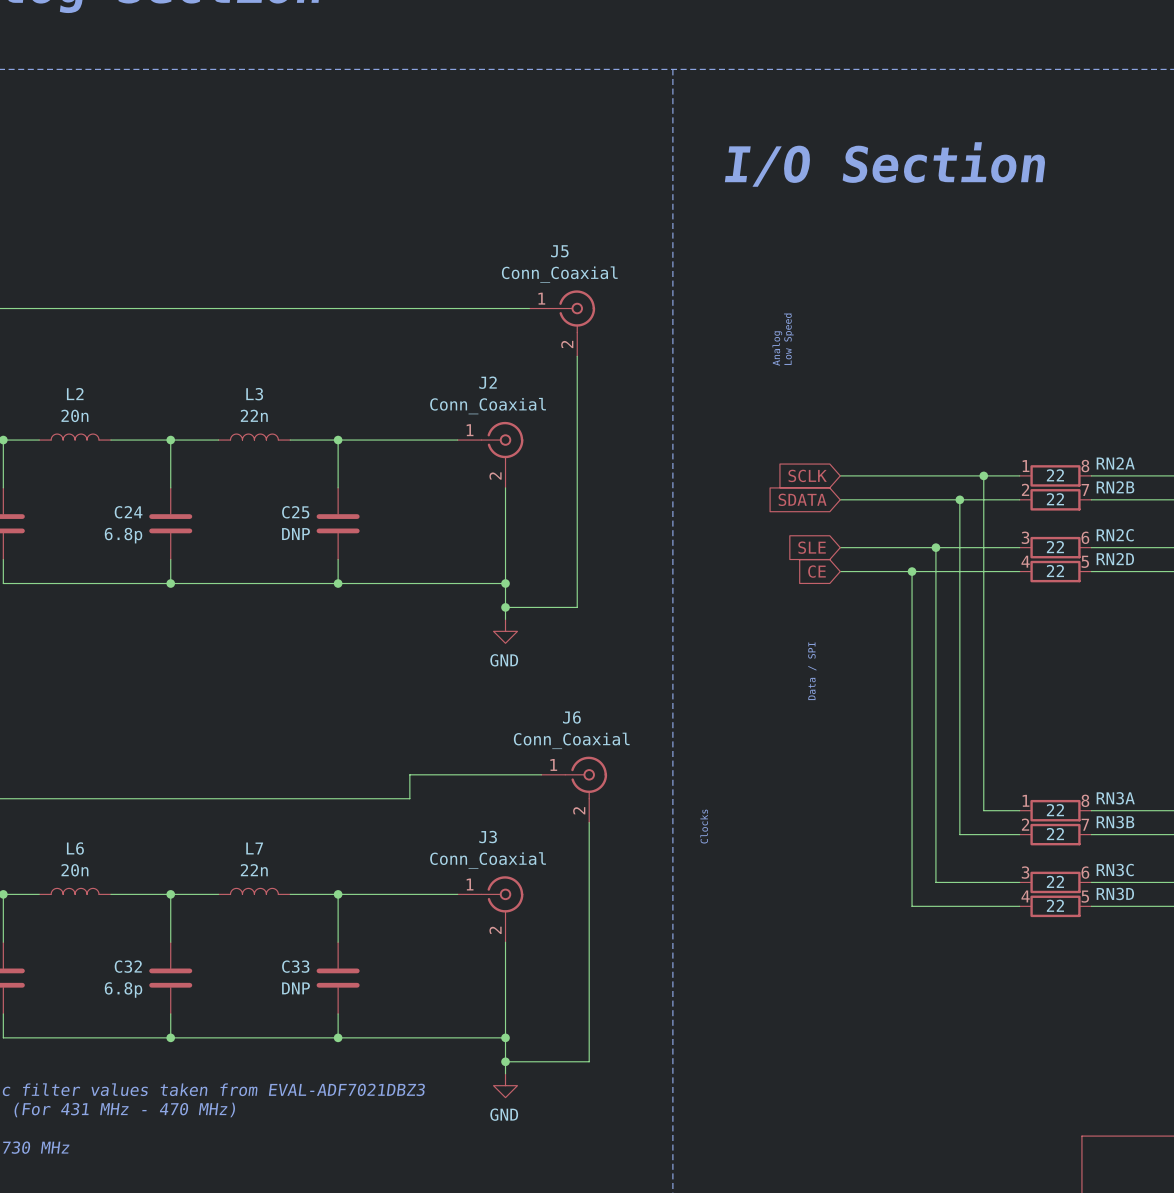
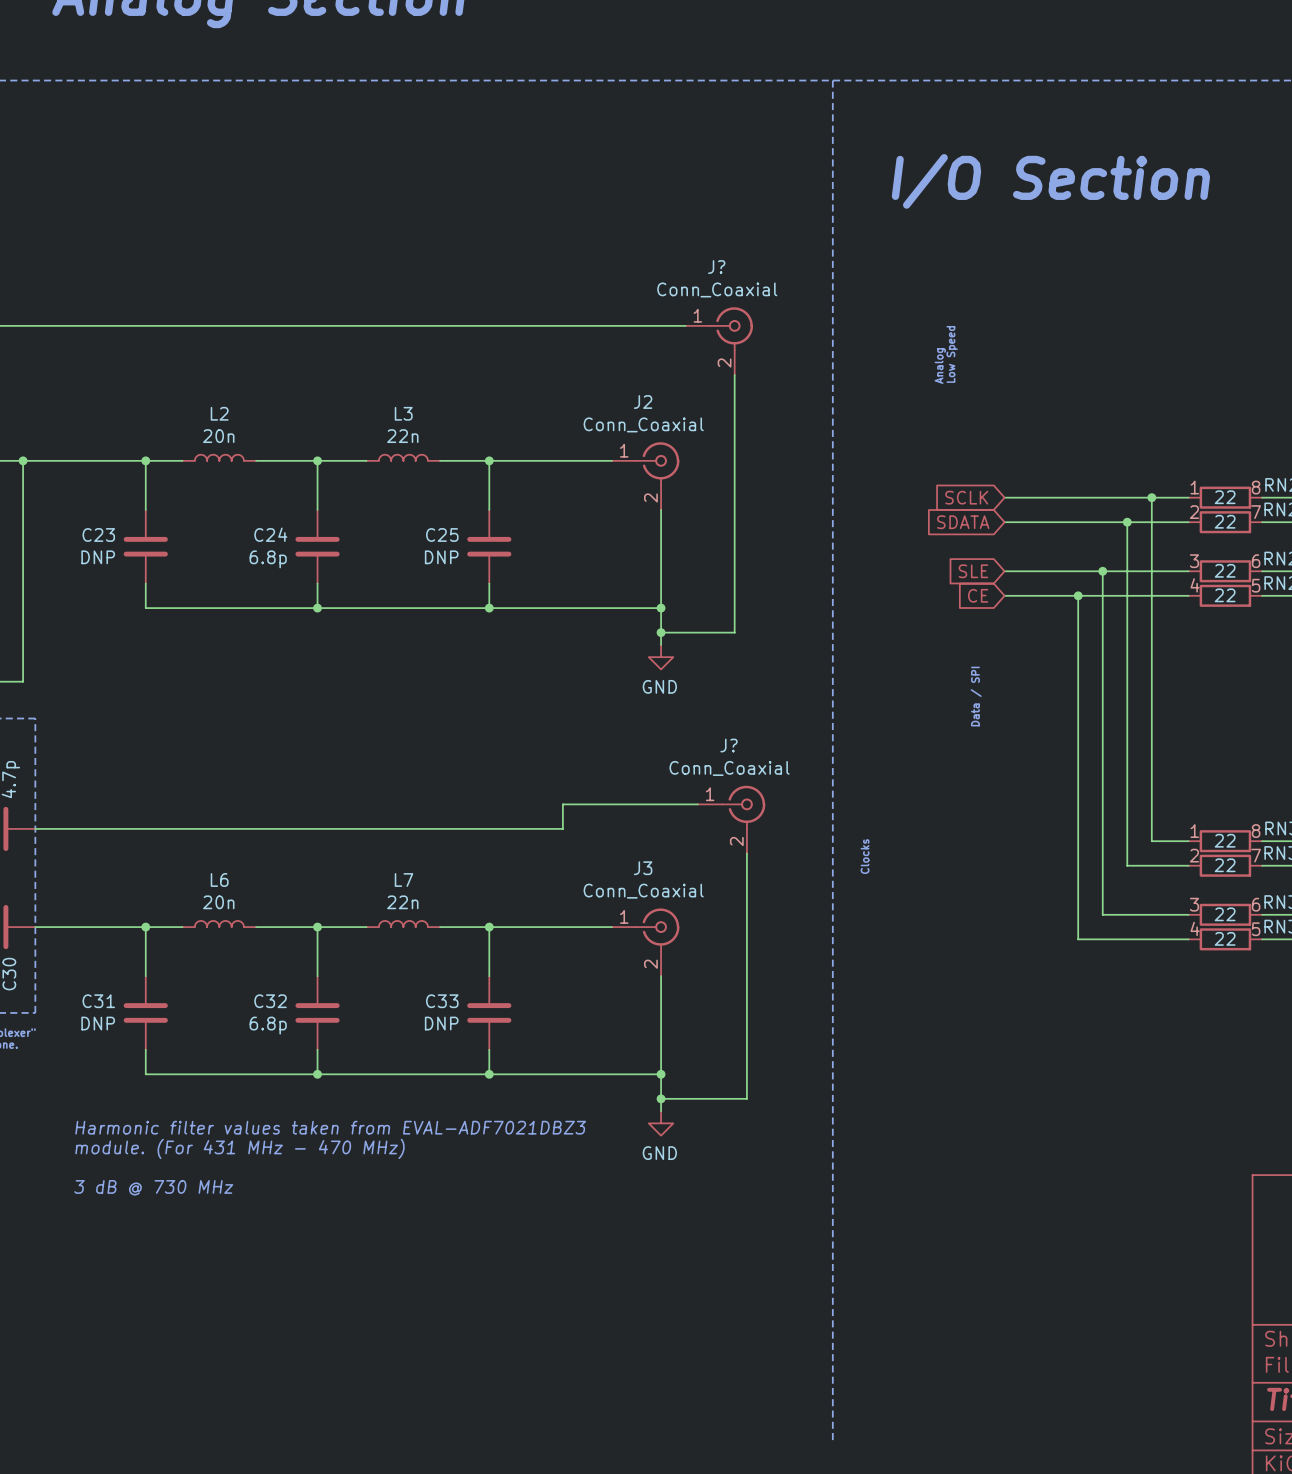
J5 name: J5 (559, 251) -> J? (716, 267)
J6 name: J6 (571, 717) -> J? (728, 745)

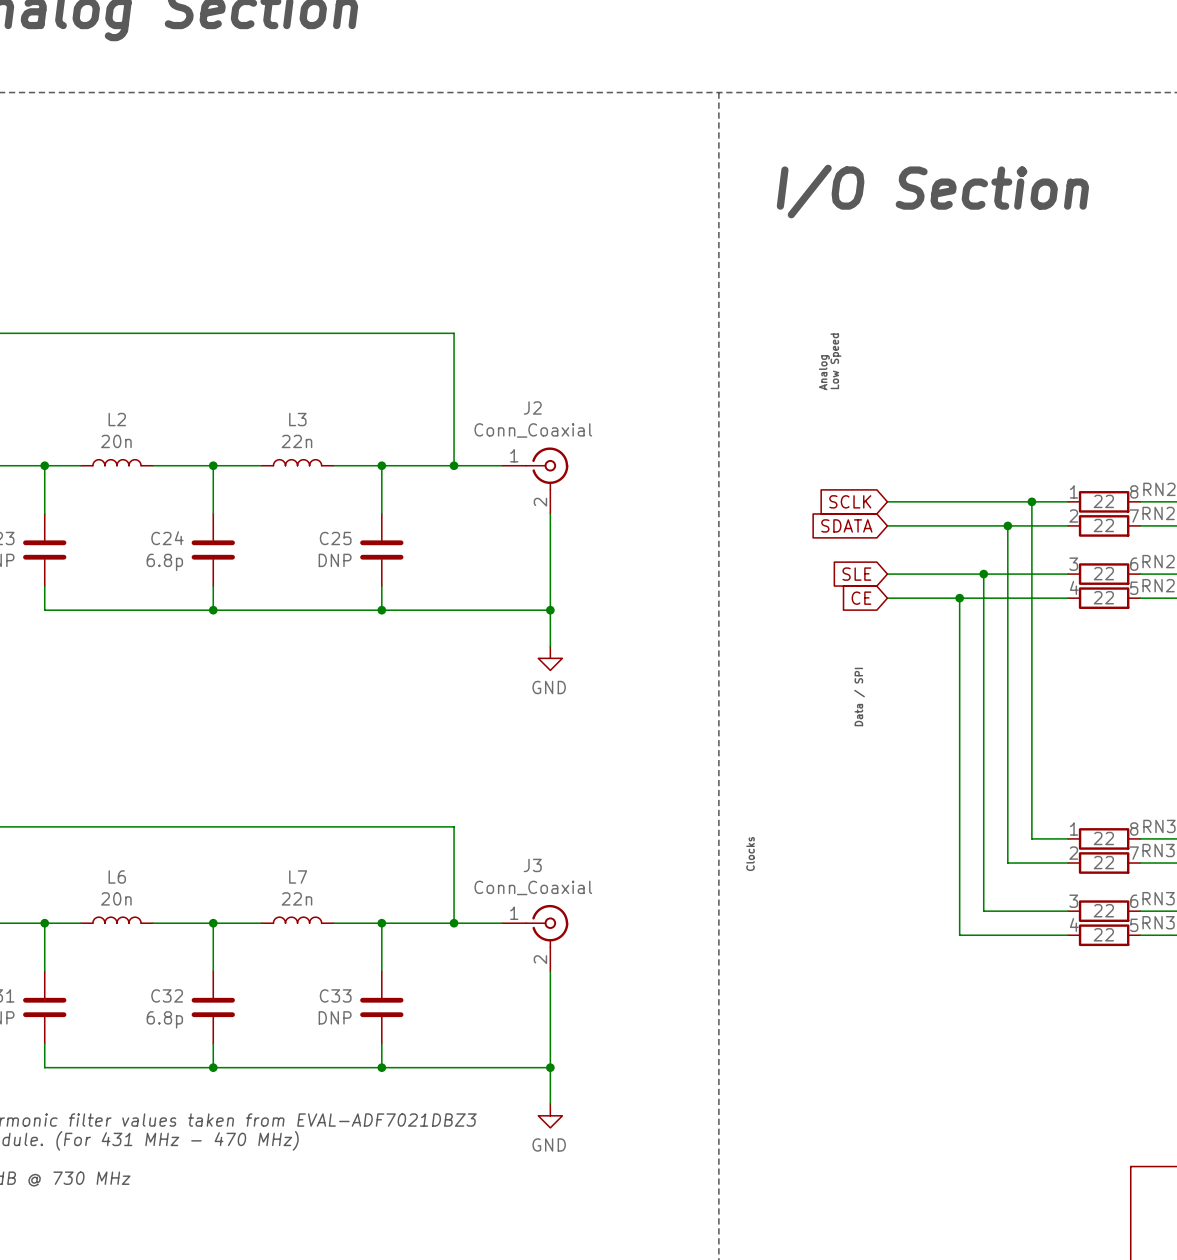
wire: (562, 325) (685, 325) -> (454, 333) (454, 465)
J?: Conn_Coaxial (719, 341) -> none
wire: (734, 374) (734, 632) (661, 632) -> none
junction: none -> (454, 465)
junction: (661, 632) -> none
wire: (697, 804) (562, 804) (562, 828) -> (454, 923) (454, 826)
J?: Conn_Coaxial (731, 819) -> none
wire: (746, 853) (746, 1098) (661, 1098) -> none
junction: none -> (454, 923)
junction: (661, 1098) -> none

